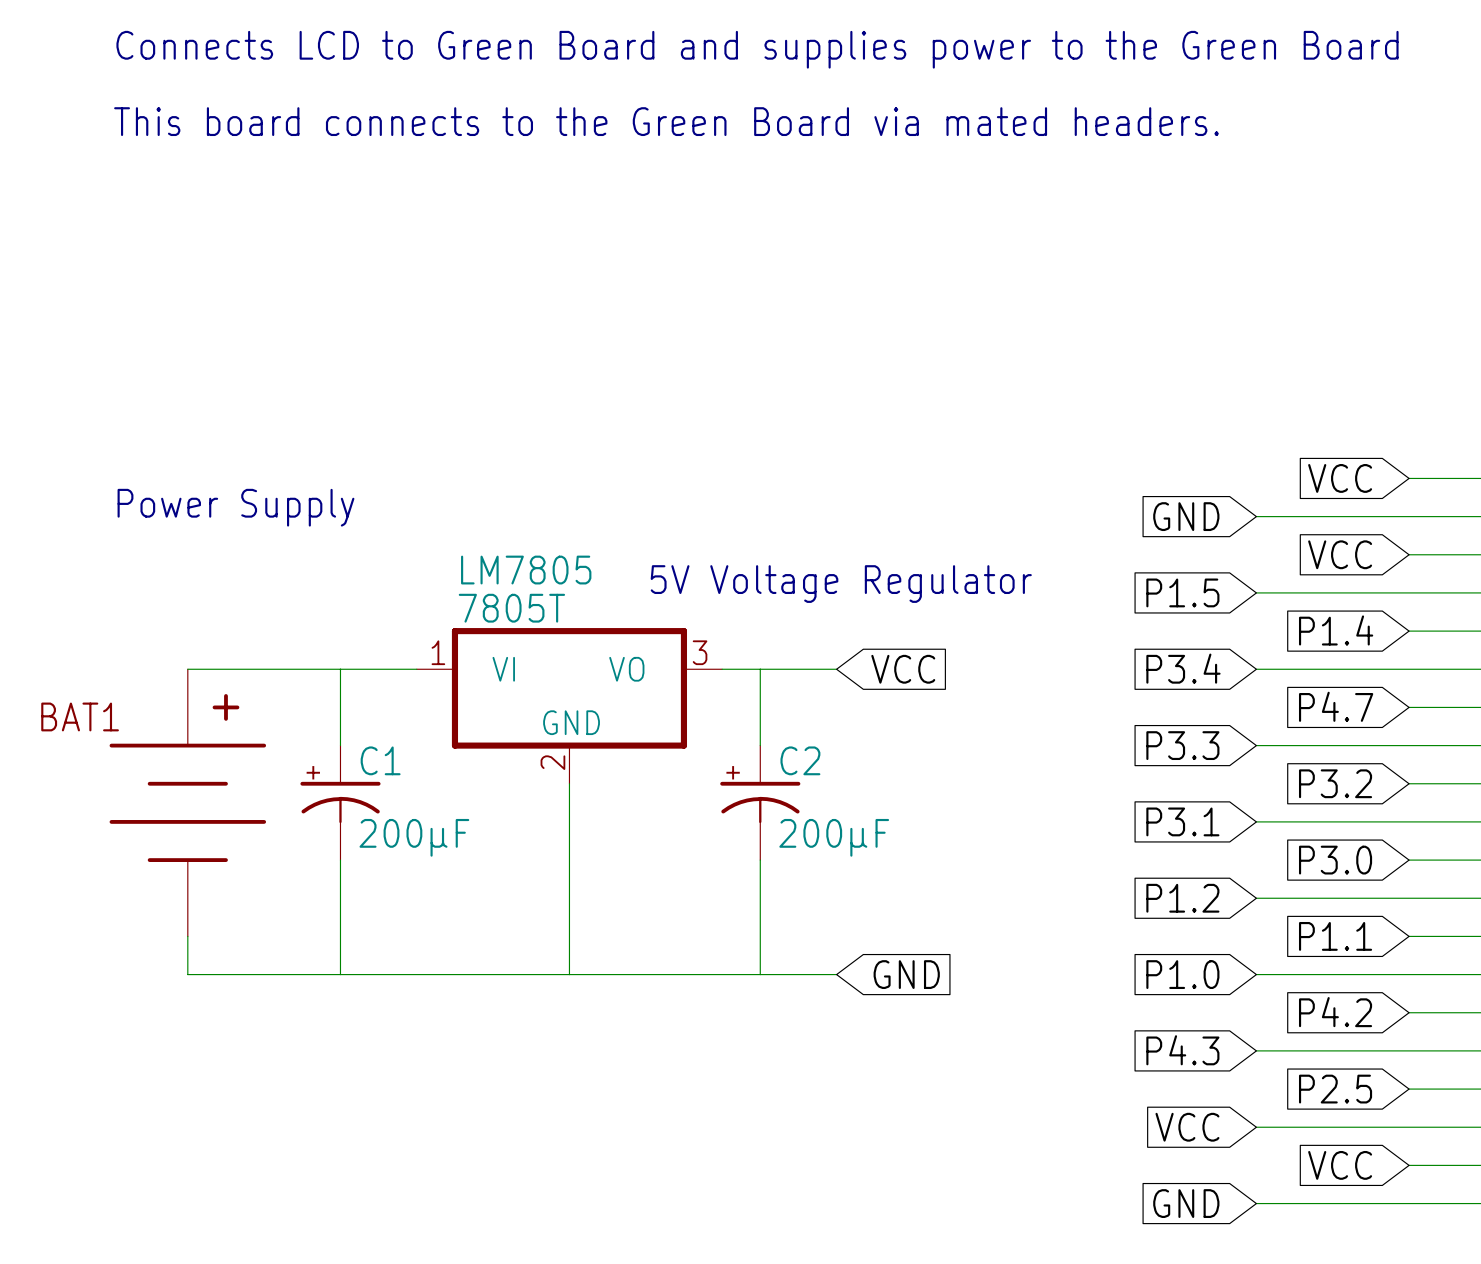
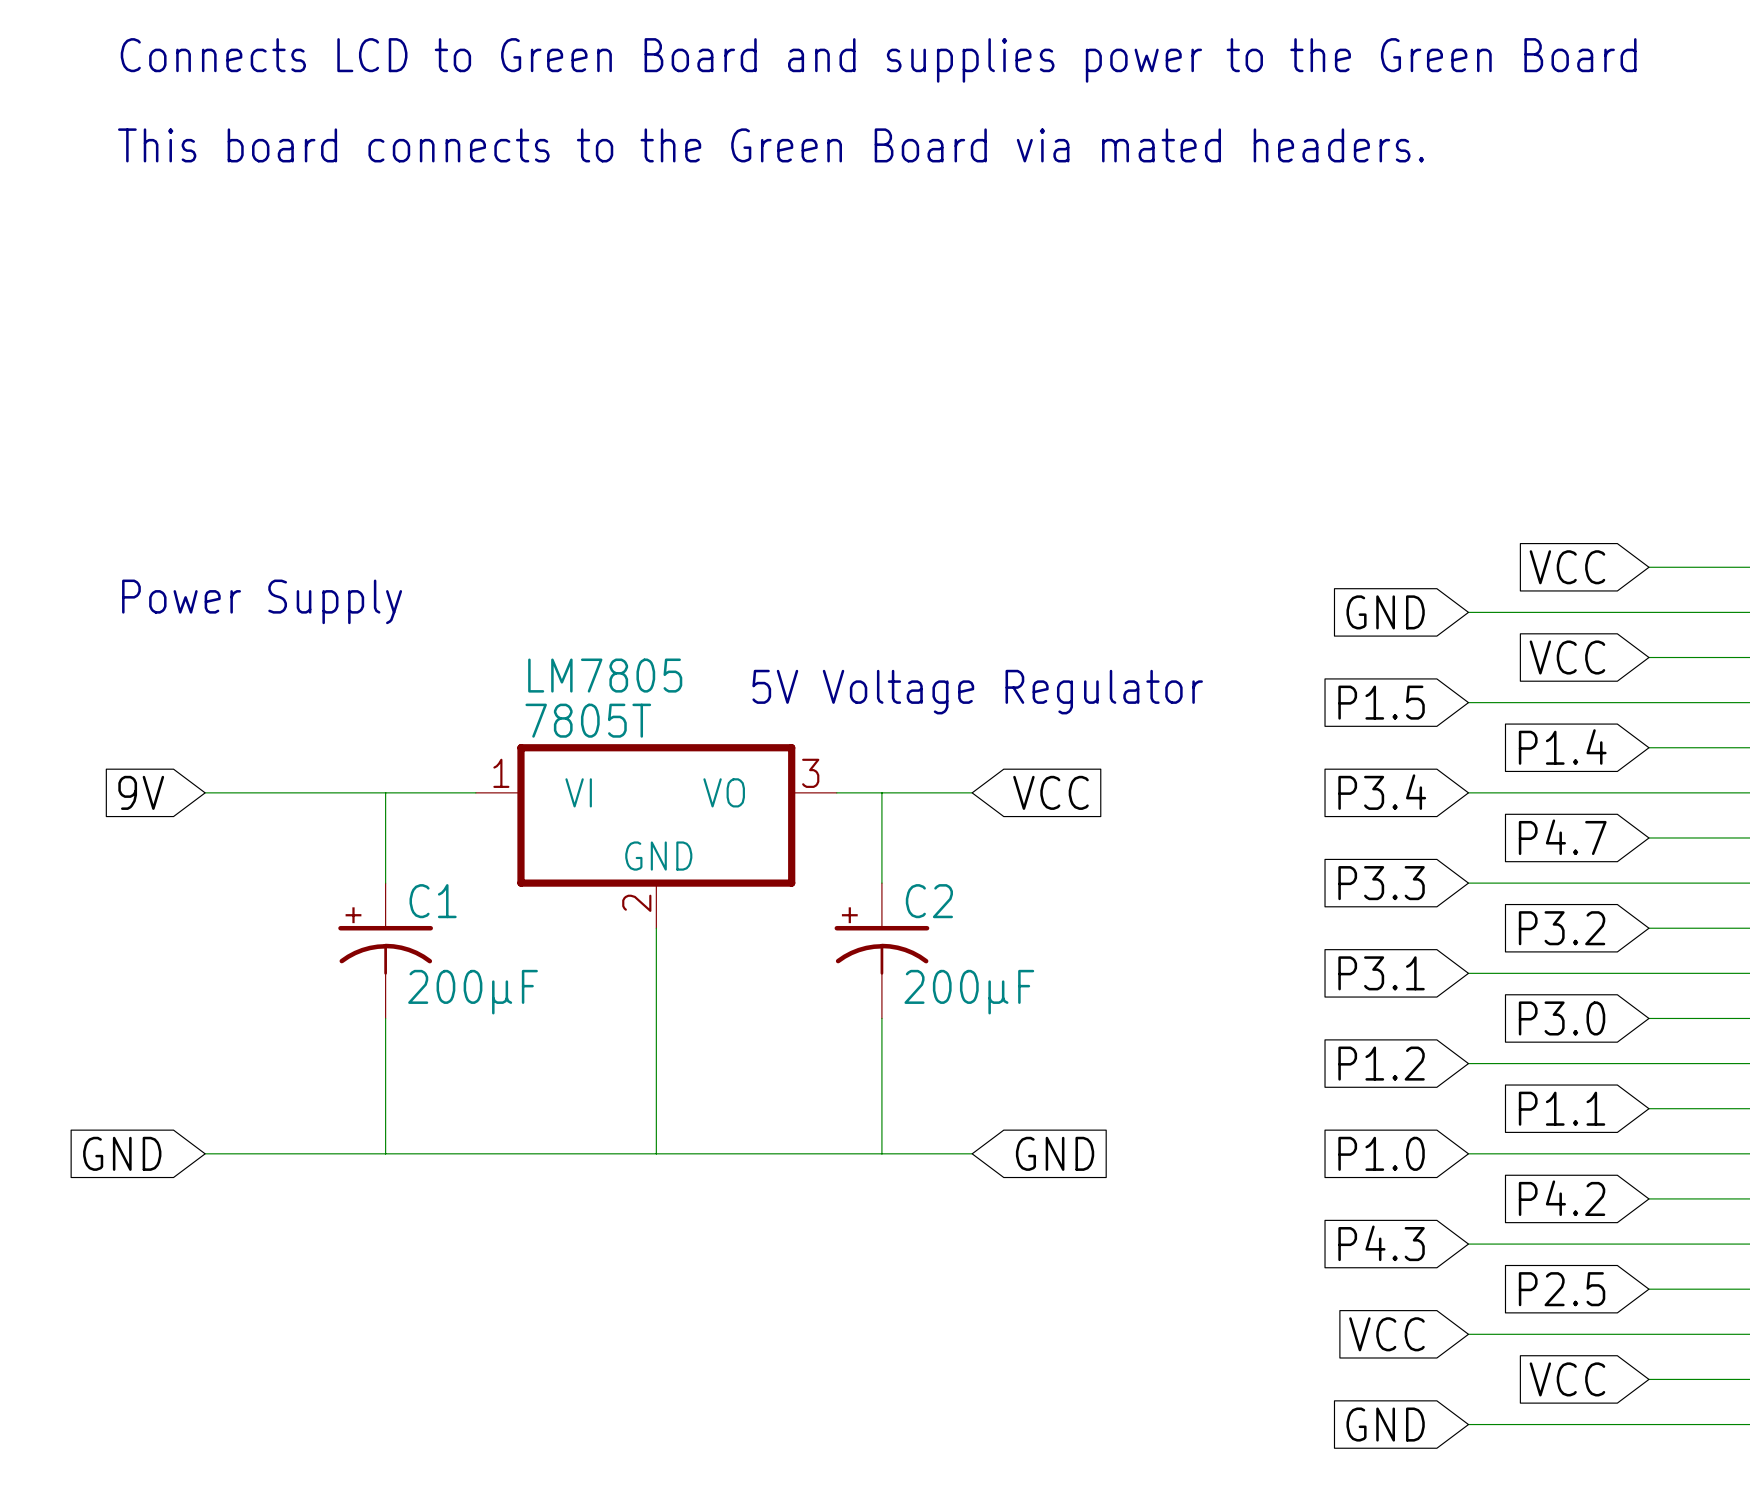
global label: none -> 9V (141, 792)
BAT1: (187, 802) -> none
wire: (187, 936) (187, 974) -> none
global label: none -> GND (122, 1153)

